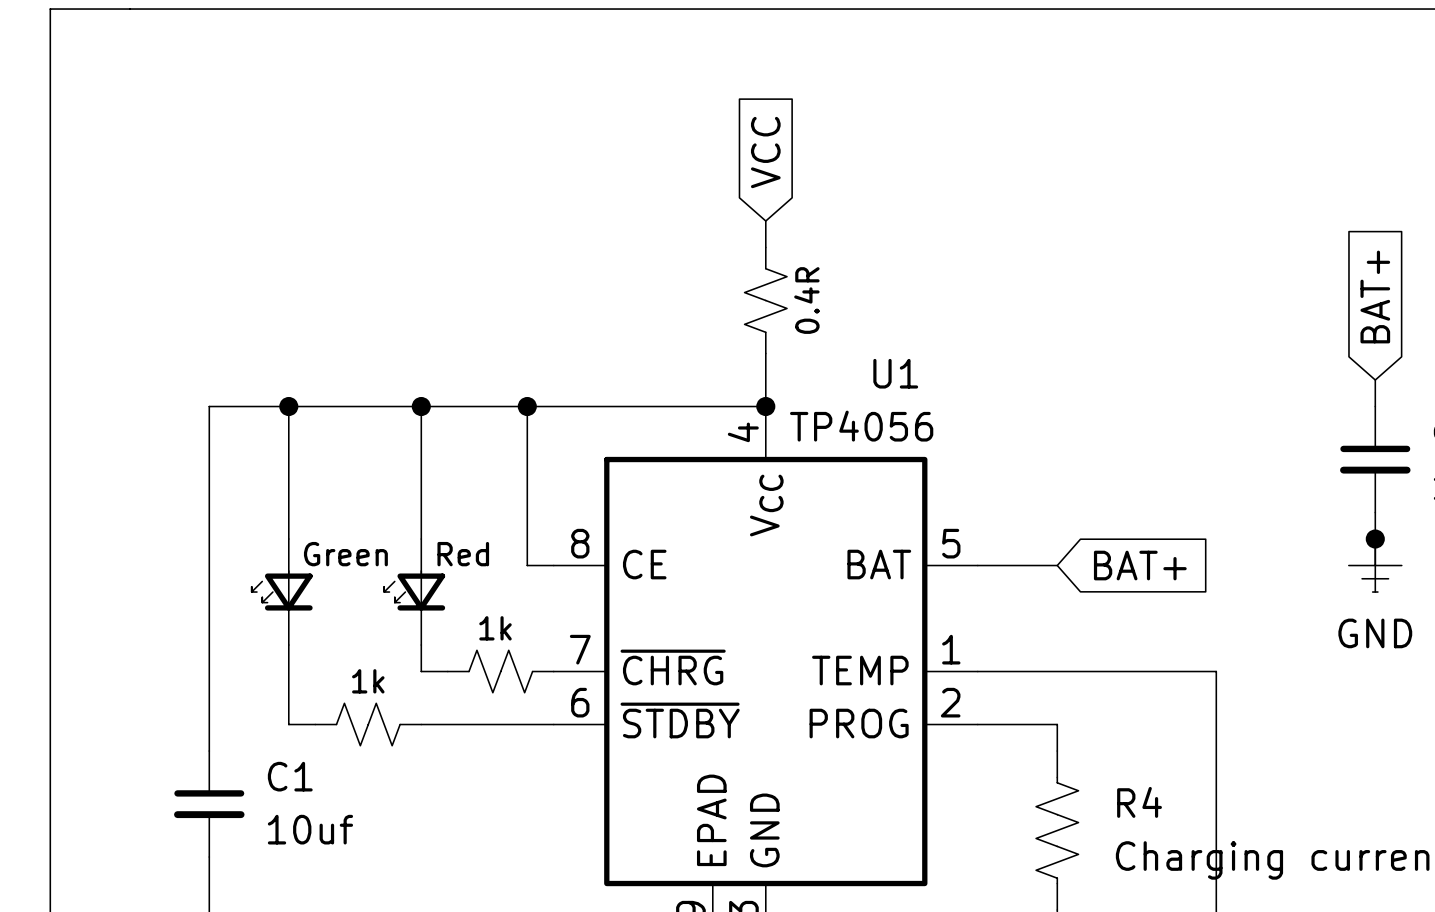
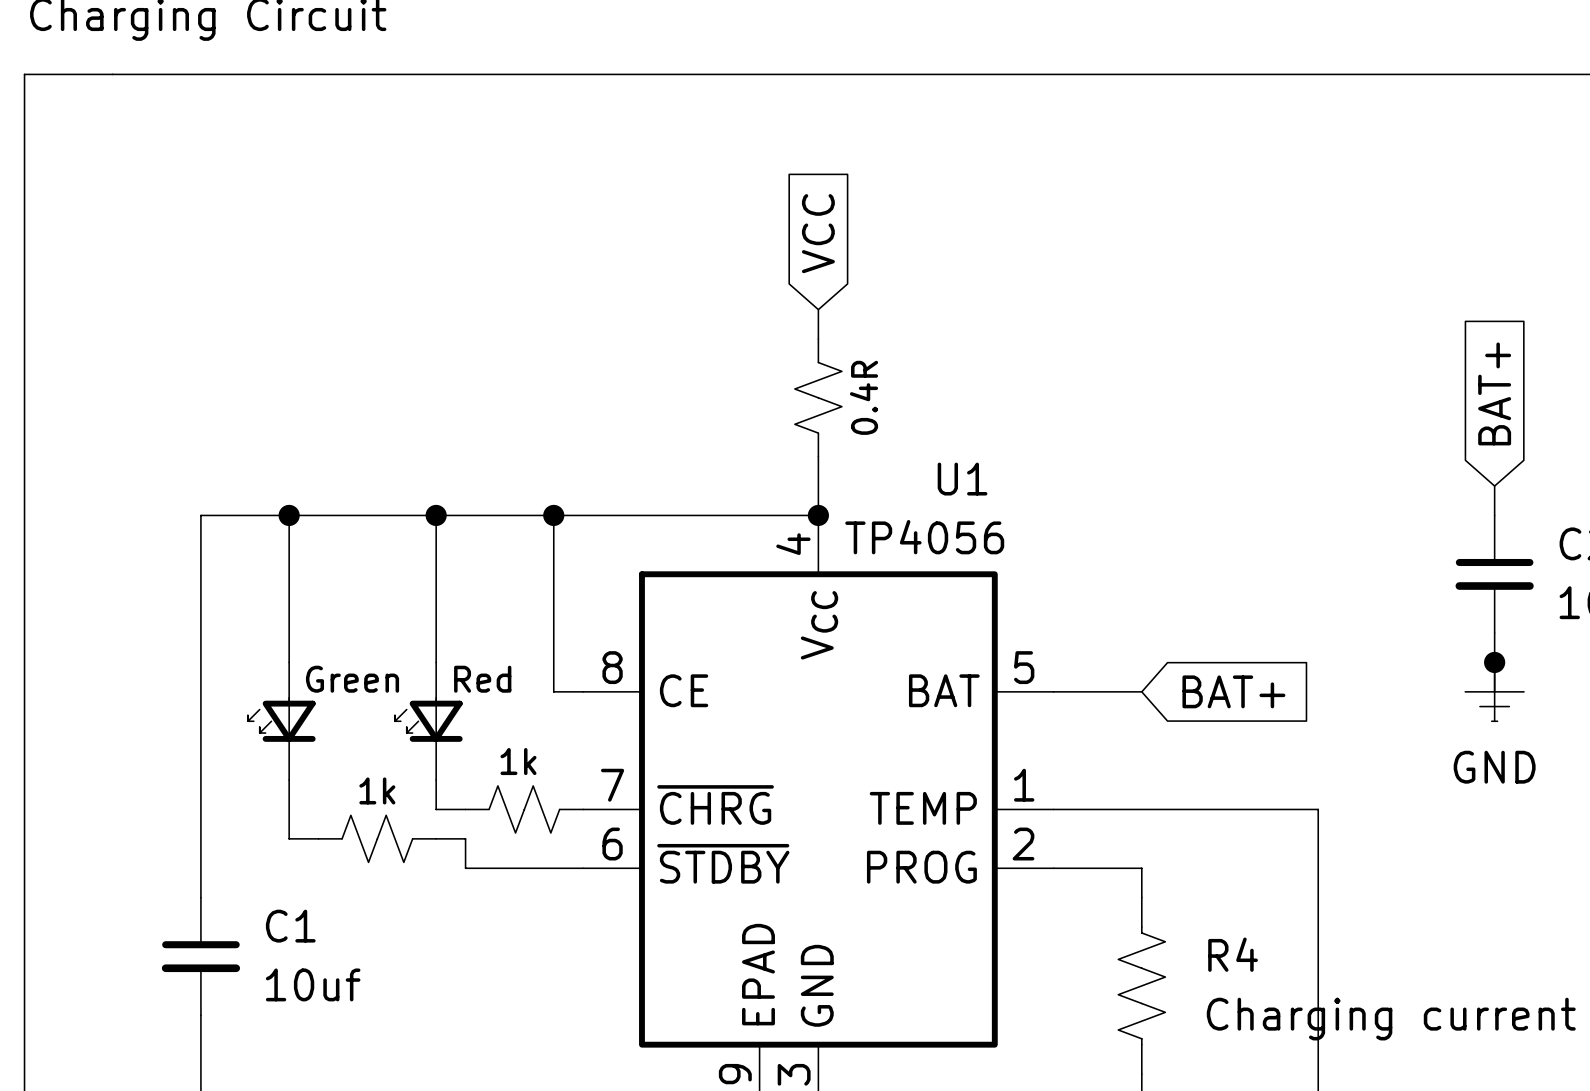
wire: (288, 698) (288, 724) (315, 724) -> (289, 838) (318, 838)
part position: (368, 724) -> (377, 838)
wire: (421, 724) (447, 724) -> (436, 838) (465, 838) (465, 868)

